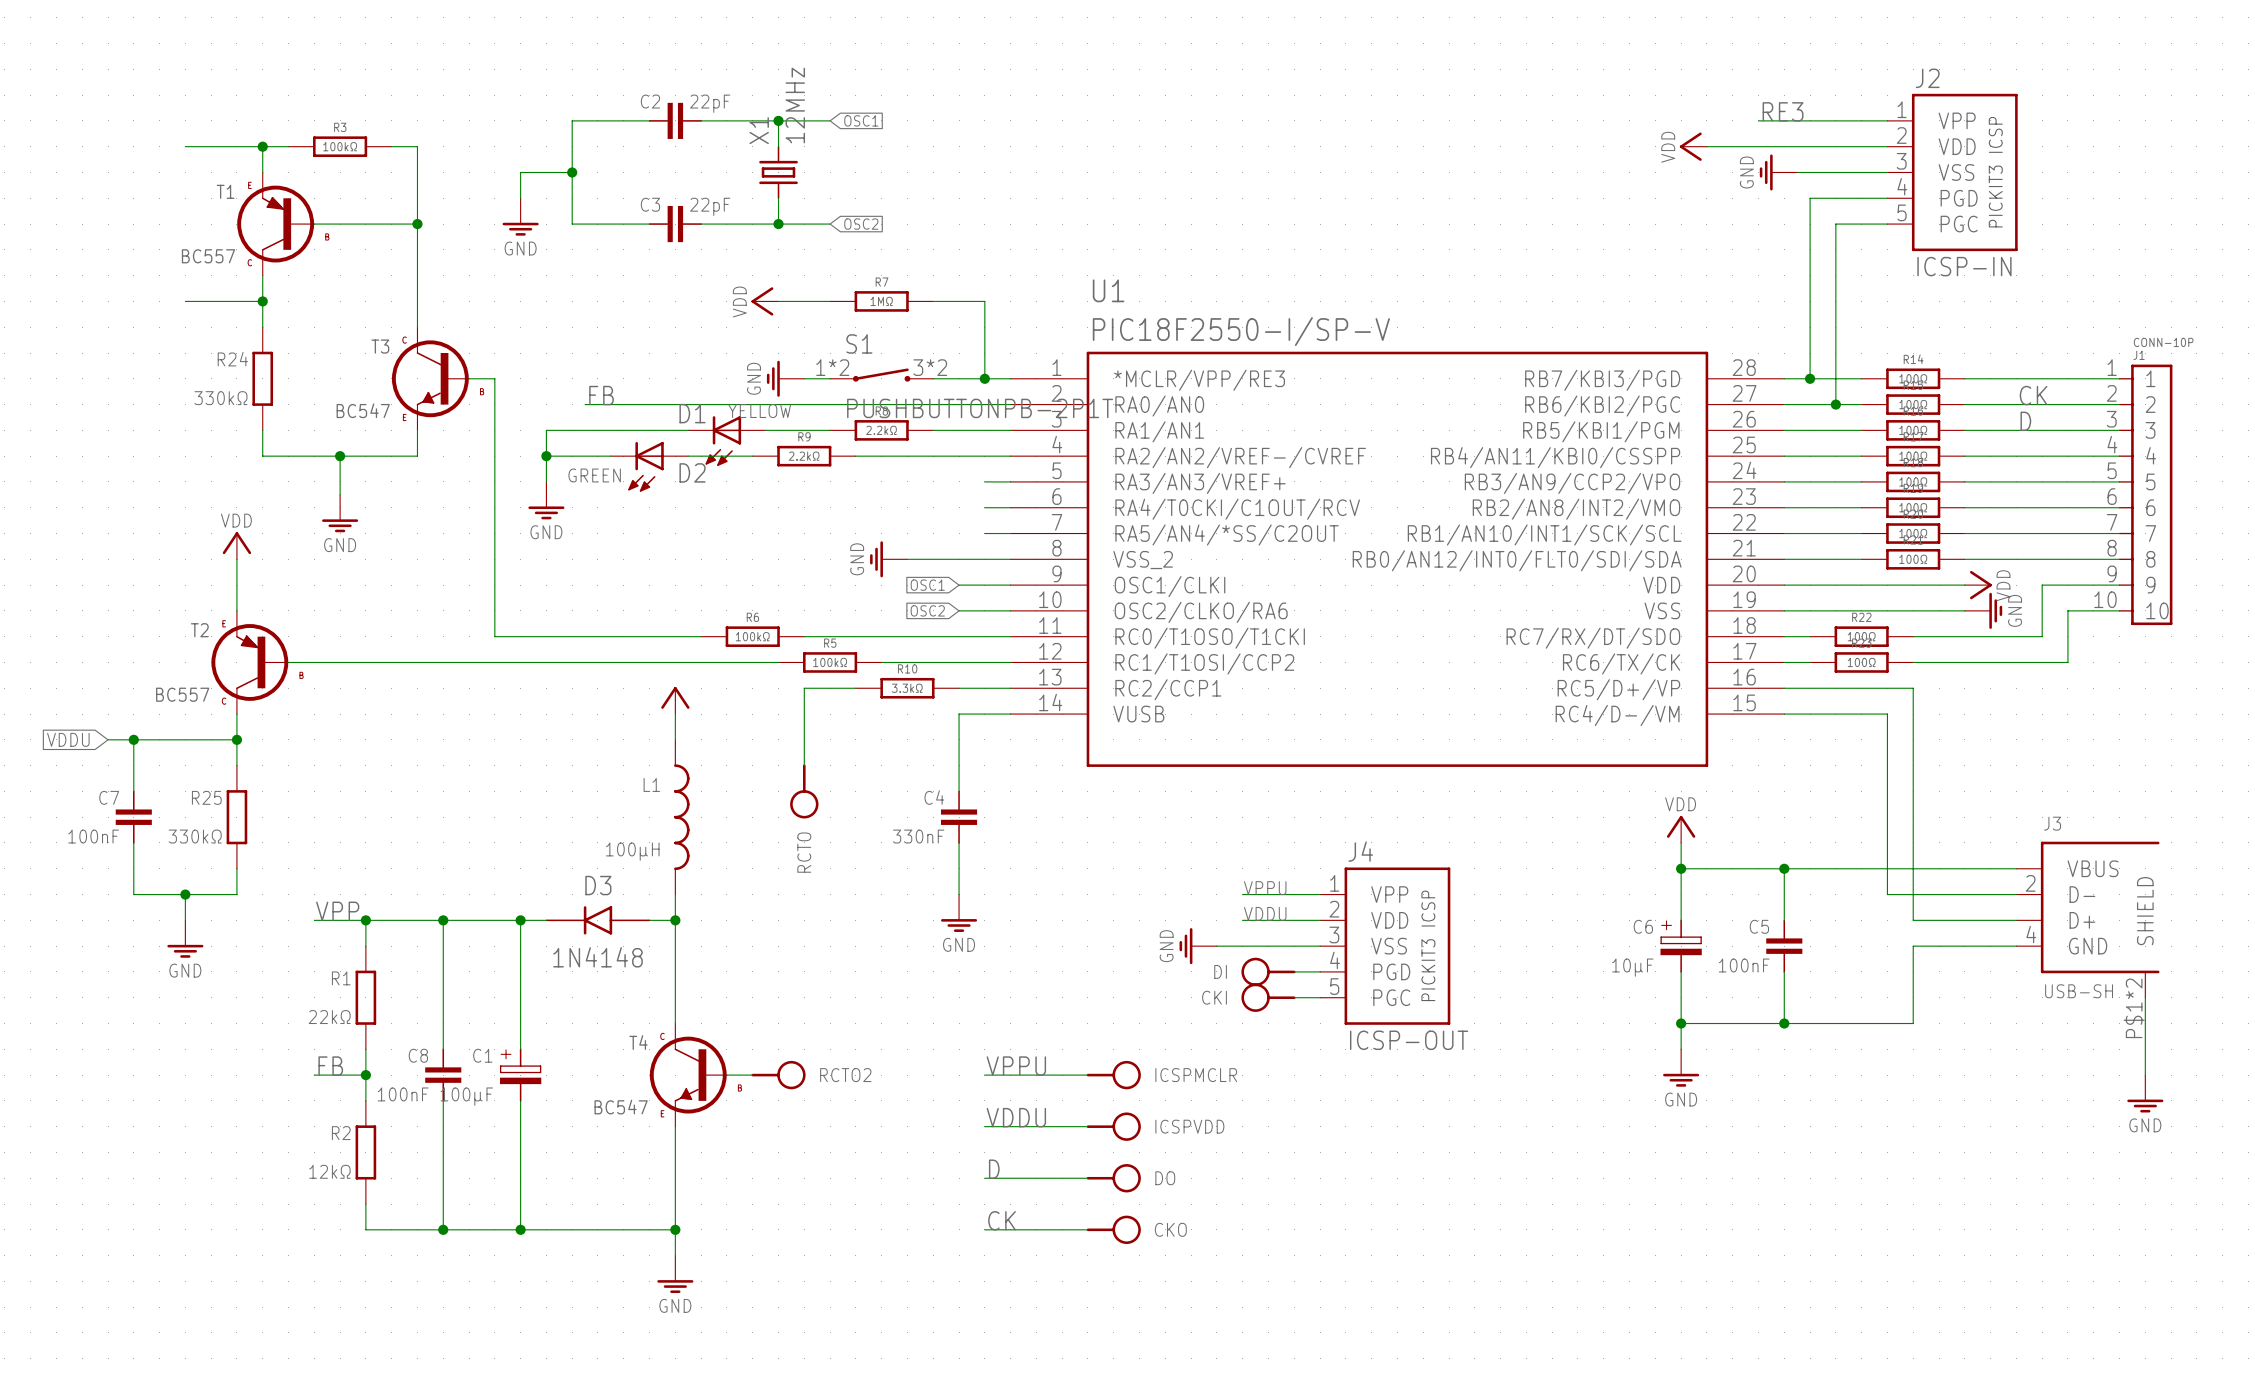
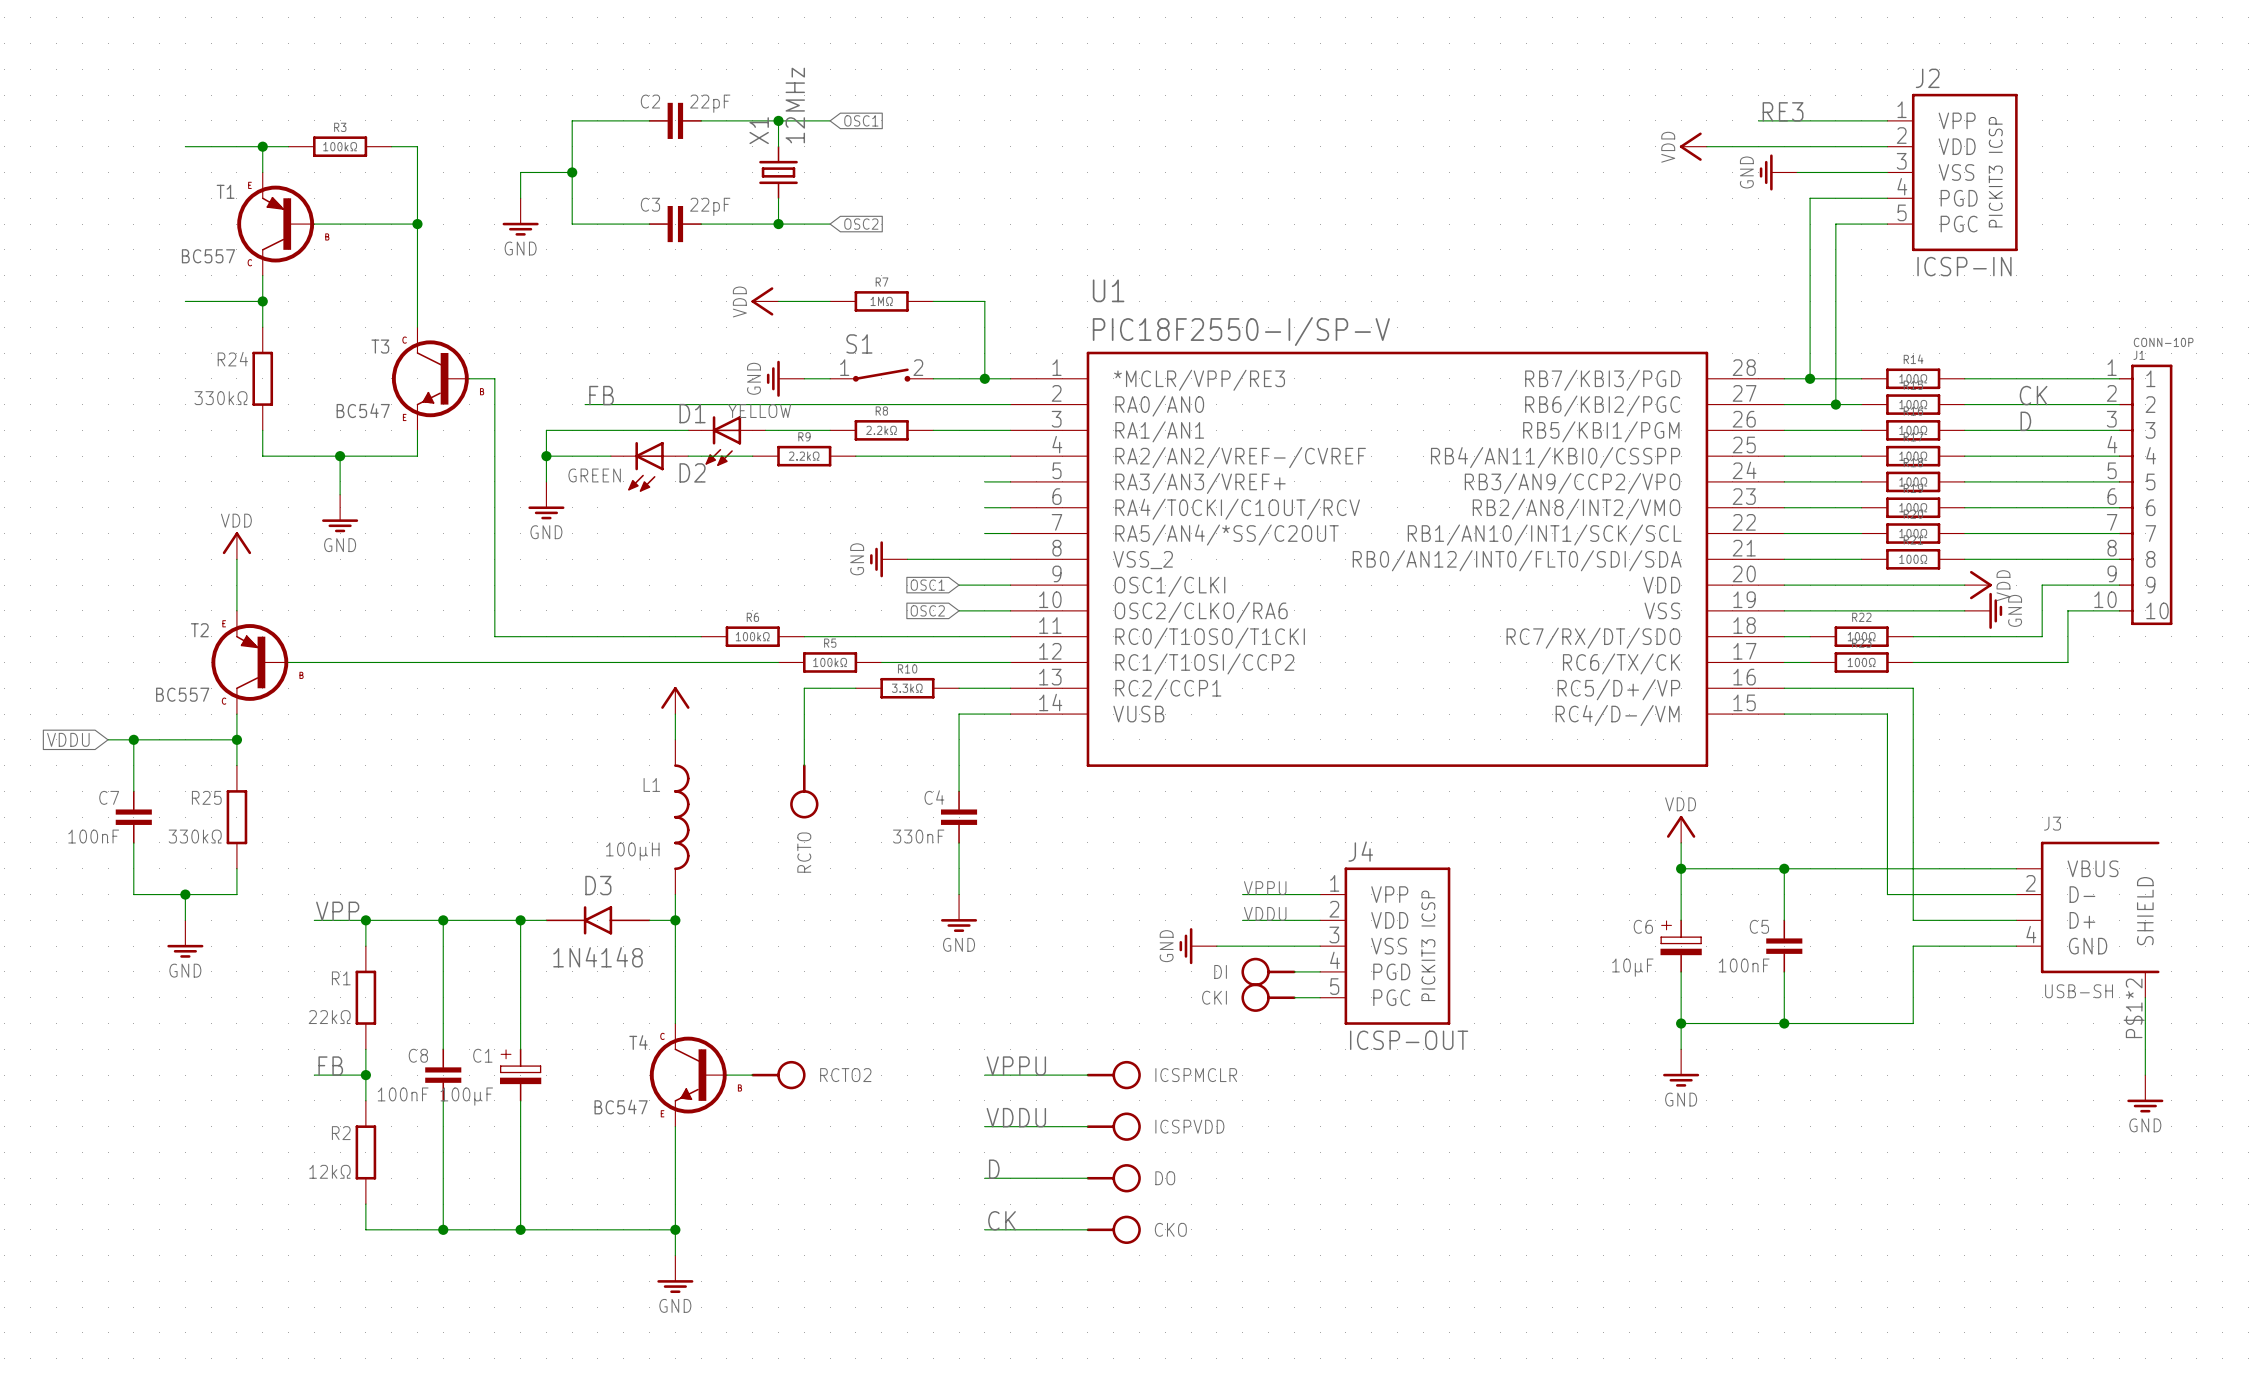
S1 pin number: 1*2 (832, 367) -> 1 (844, 367)
S1 pin number: 3*2 (930, 367) -> 2 (918, 367)
S1 value: PUSHBUTTONPB-2P1T (980, 408) -> none

